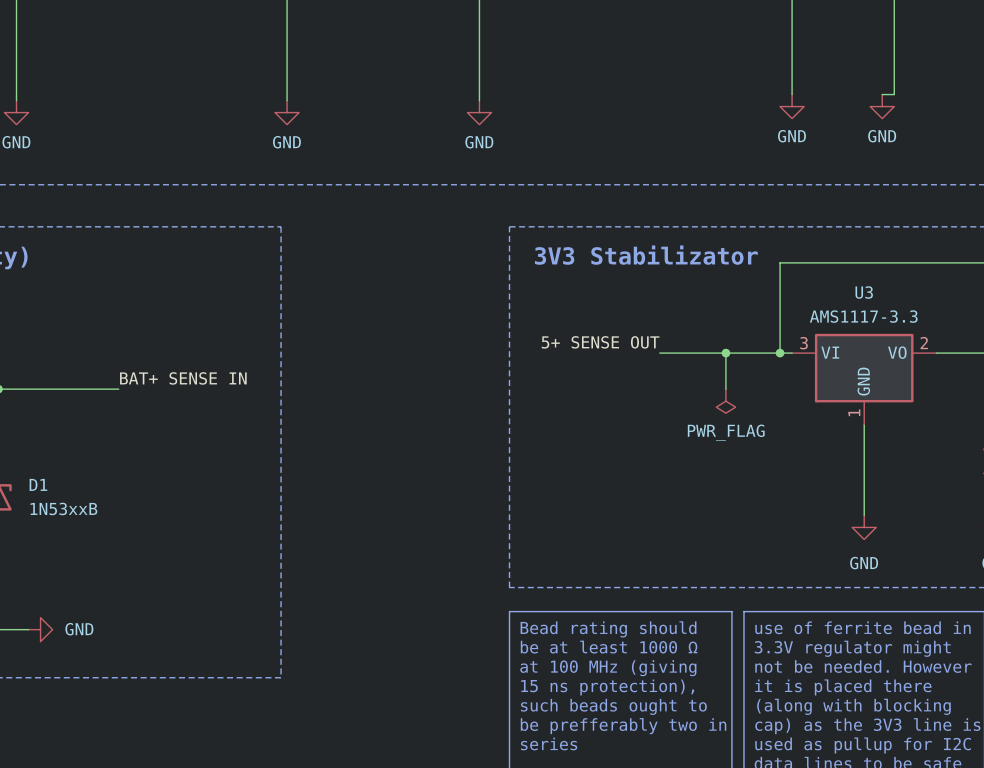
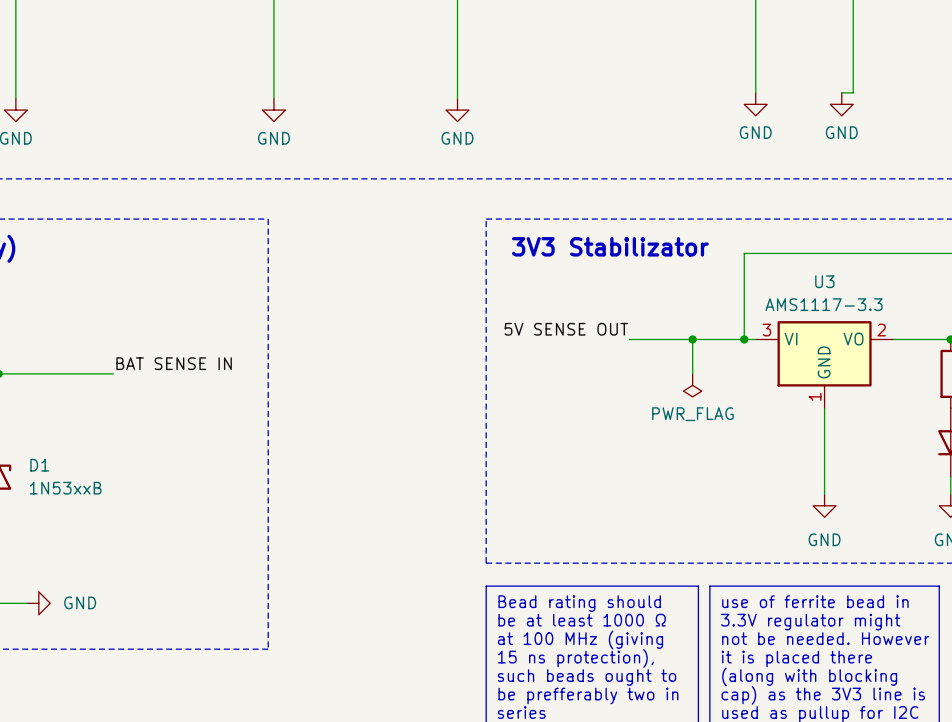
label: 5+ SENSE OUT (600, 342) -> 5V SENSE OUT (566, 329)
label: BAT+ SENSE IN (183, 378) -> BAT SENSE IN (174, 363)

